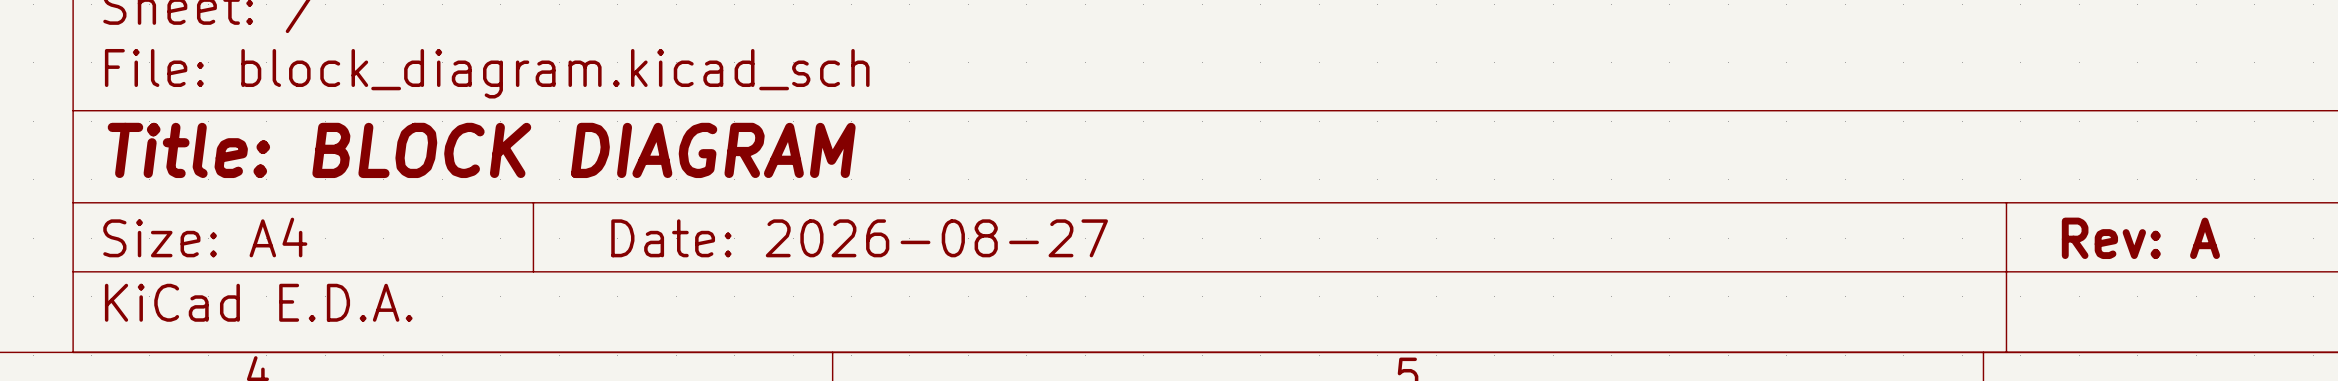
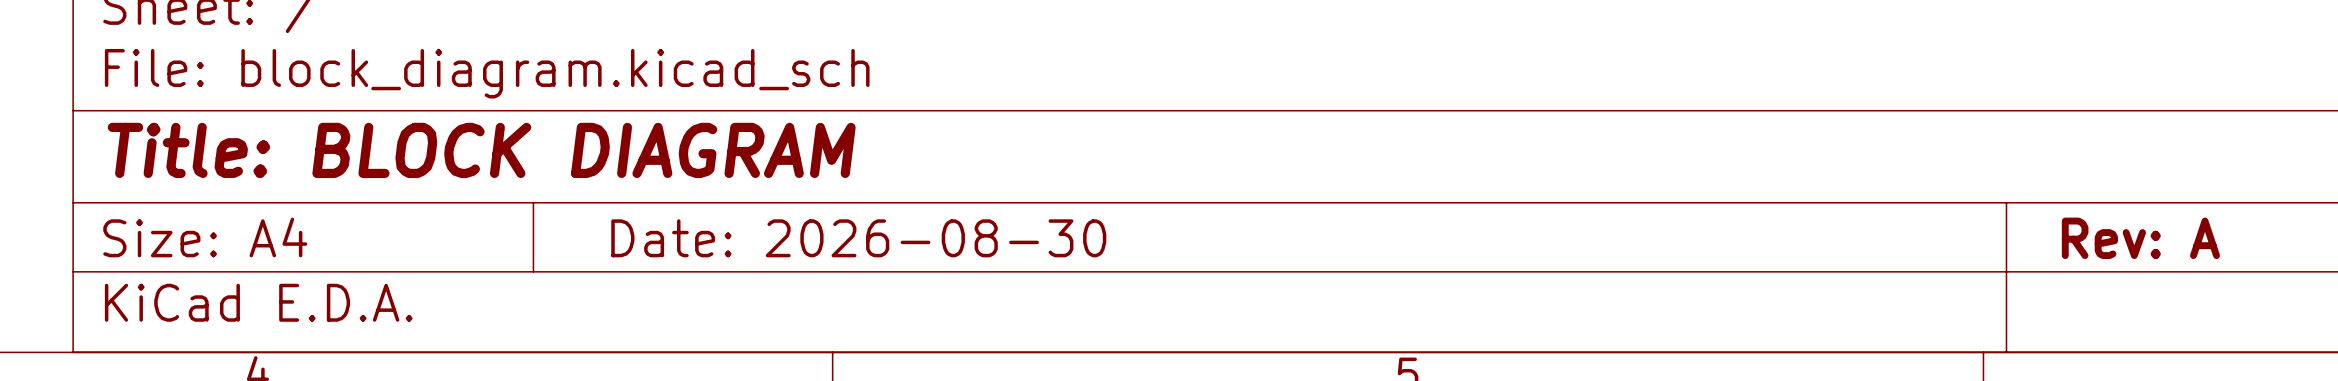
title block: Date: 2026-08-27 (859, 238) -> Date: 2026-08-30 (858, 238)

